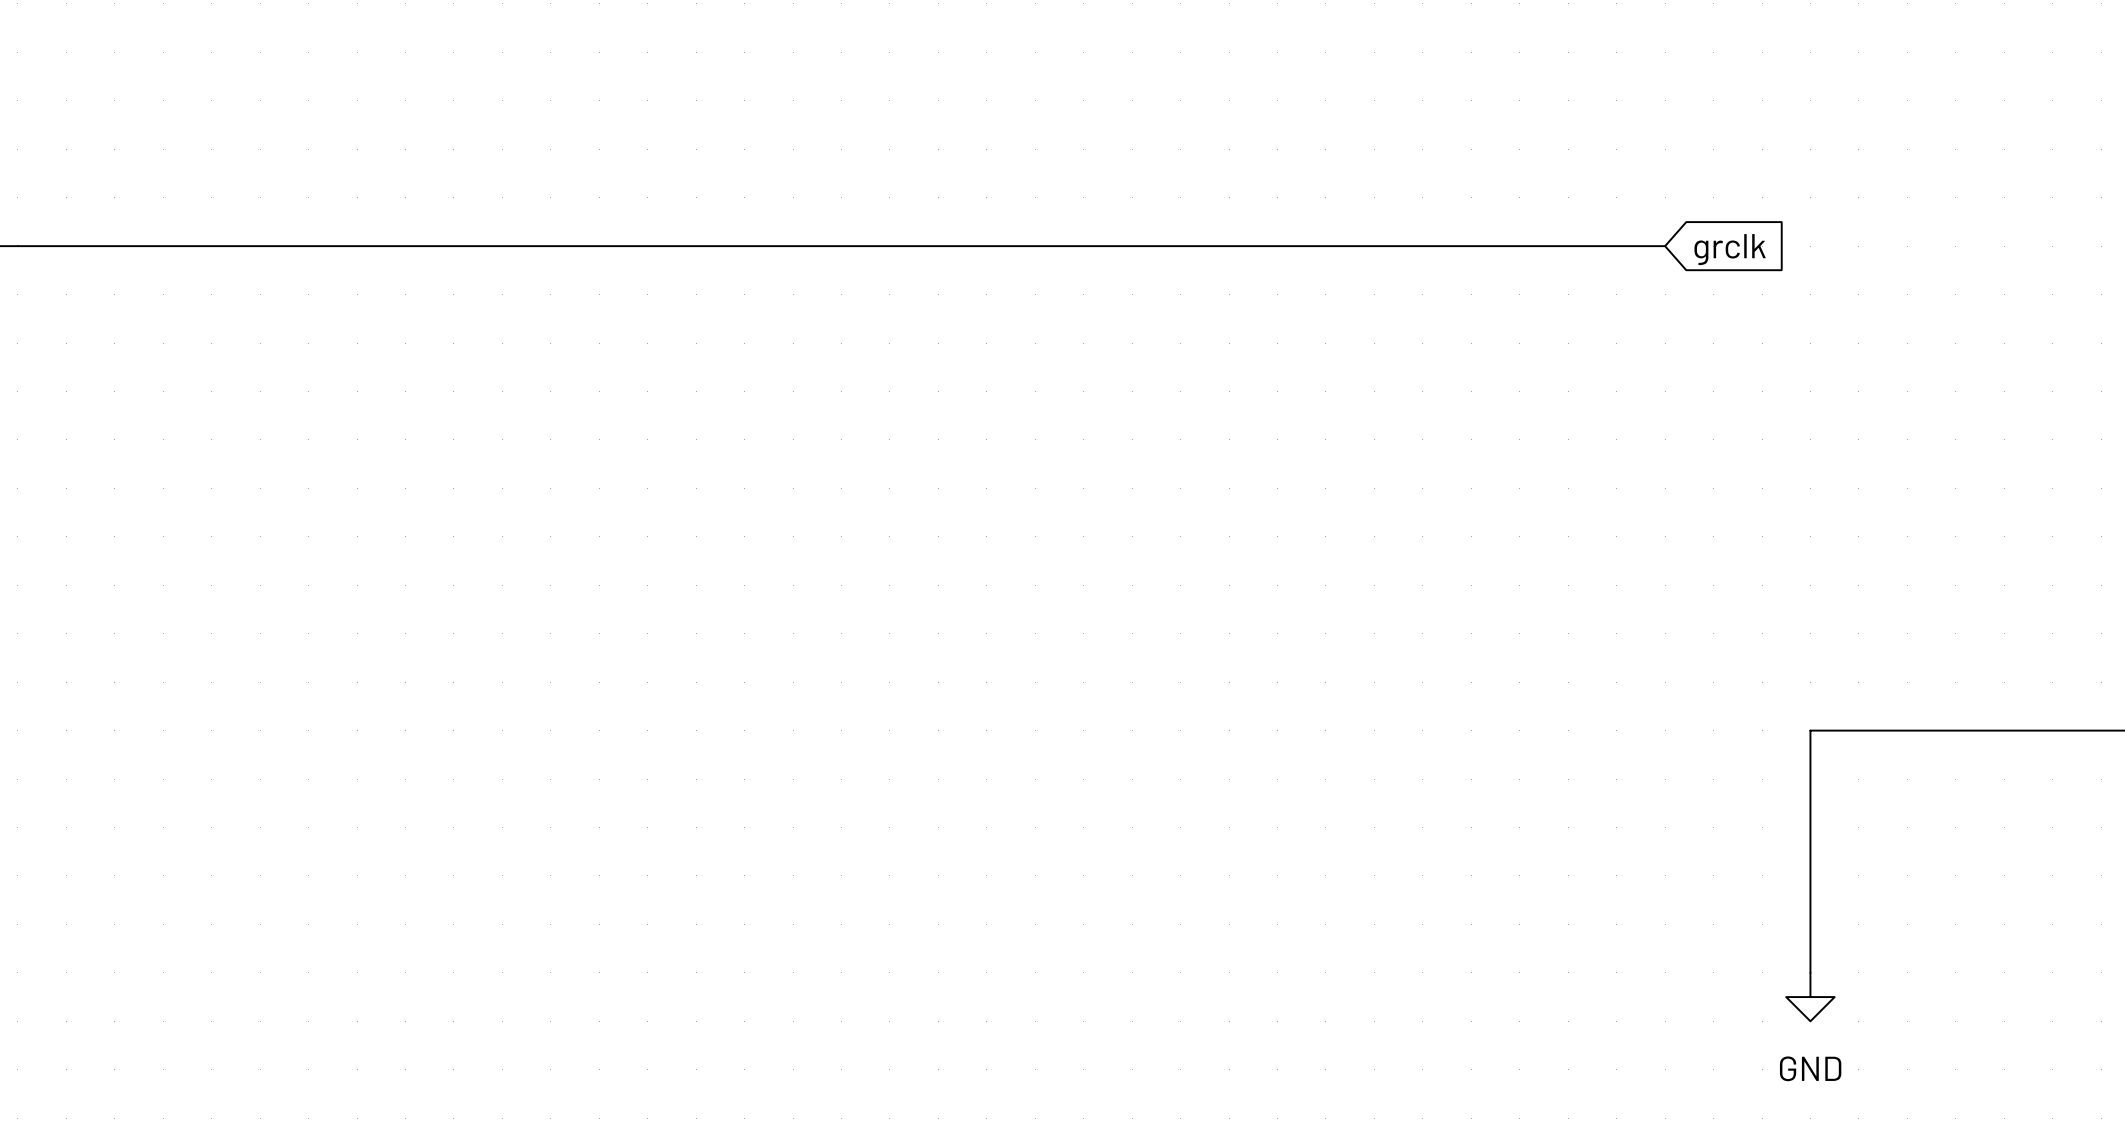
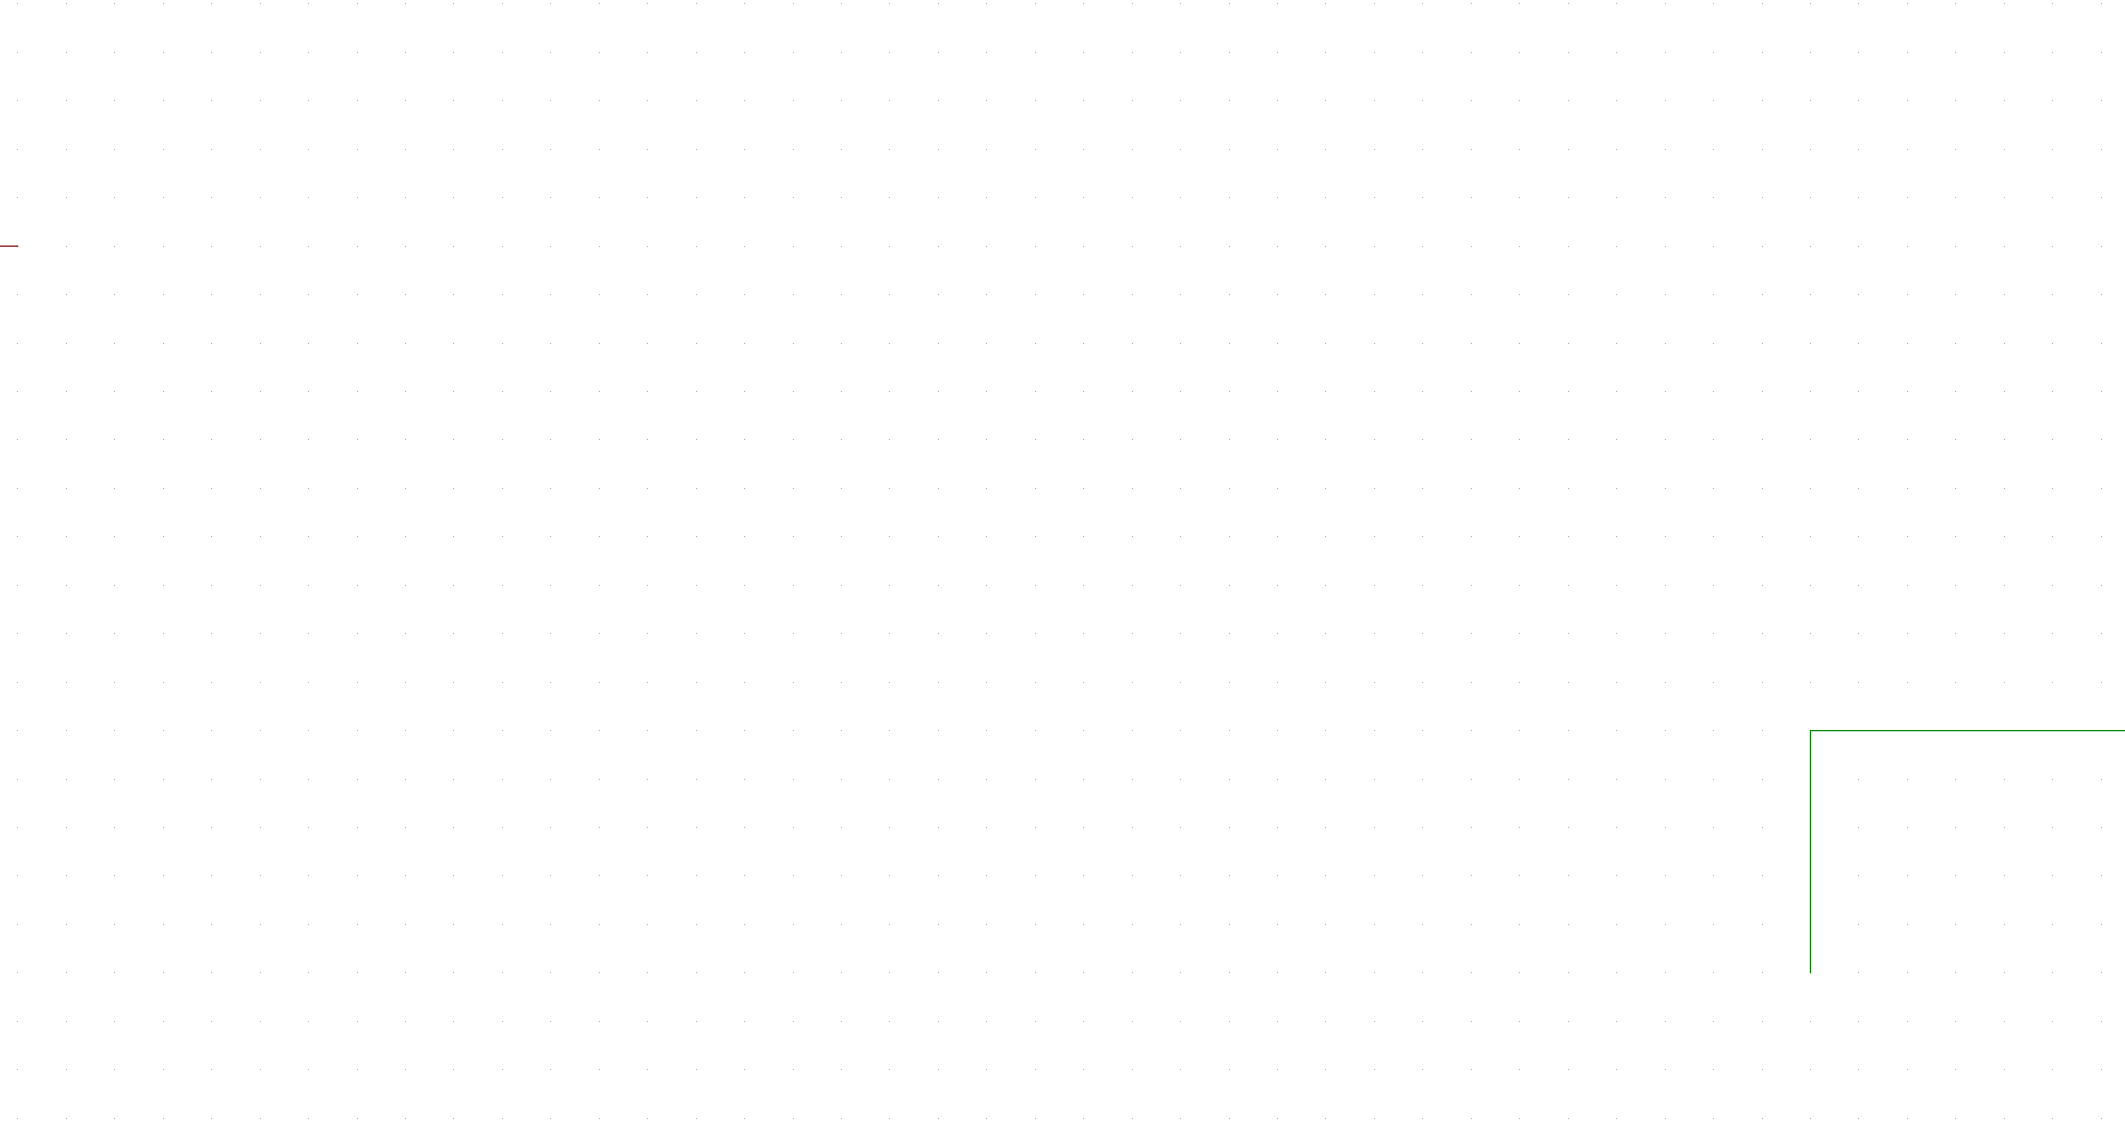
wire: (17, 246) (1665, 246) -> none
global label: grclk (1730, 249) -> none
power symbol: GND (1810, 997) -> none

